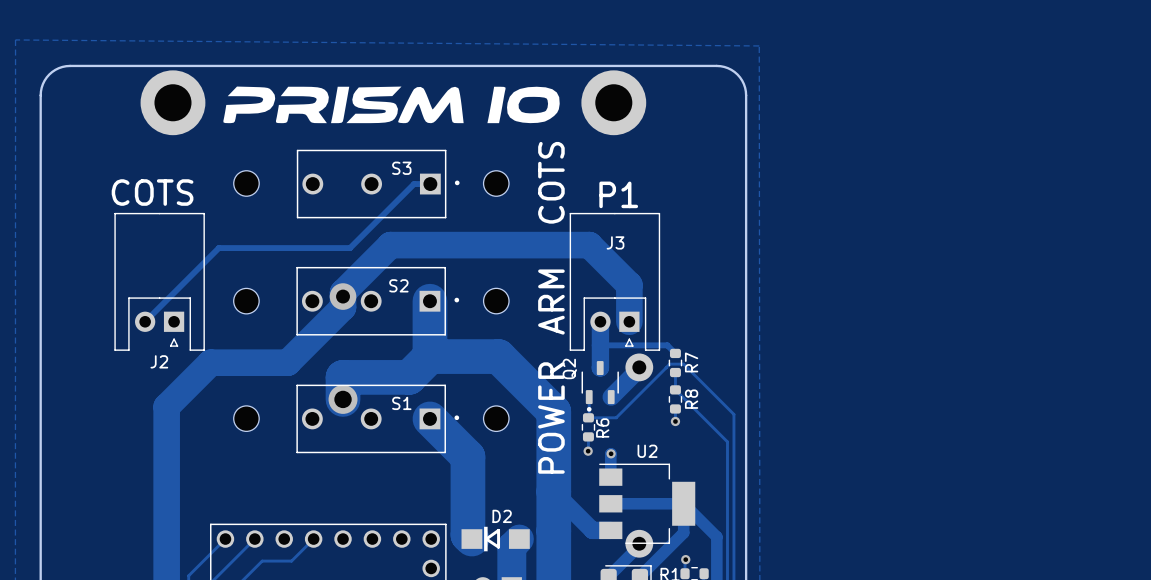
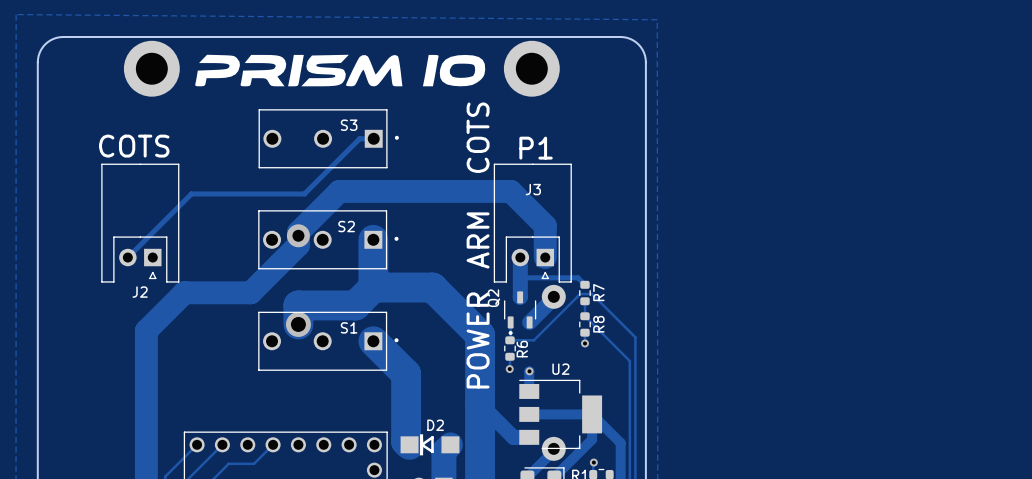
part: (246, 183) -> none
part: (496, 183) -> none
part: (246, 301) -> none
part: (496, 301) -> none
part: (246, 418) -> none
part: (496, 418) -> none

